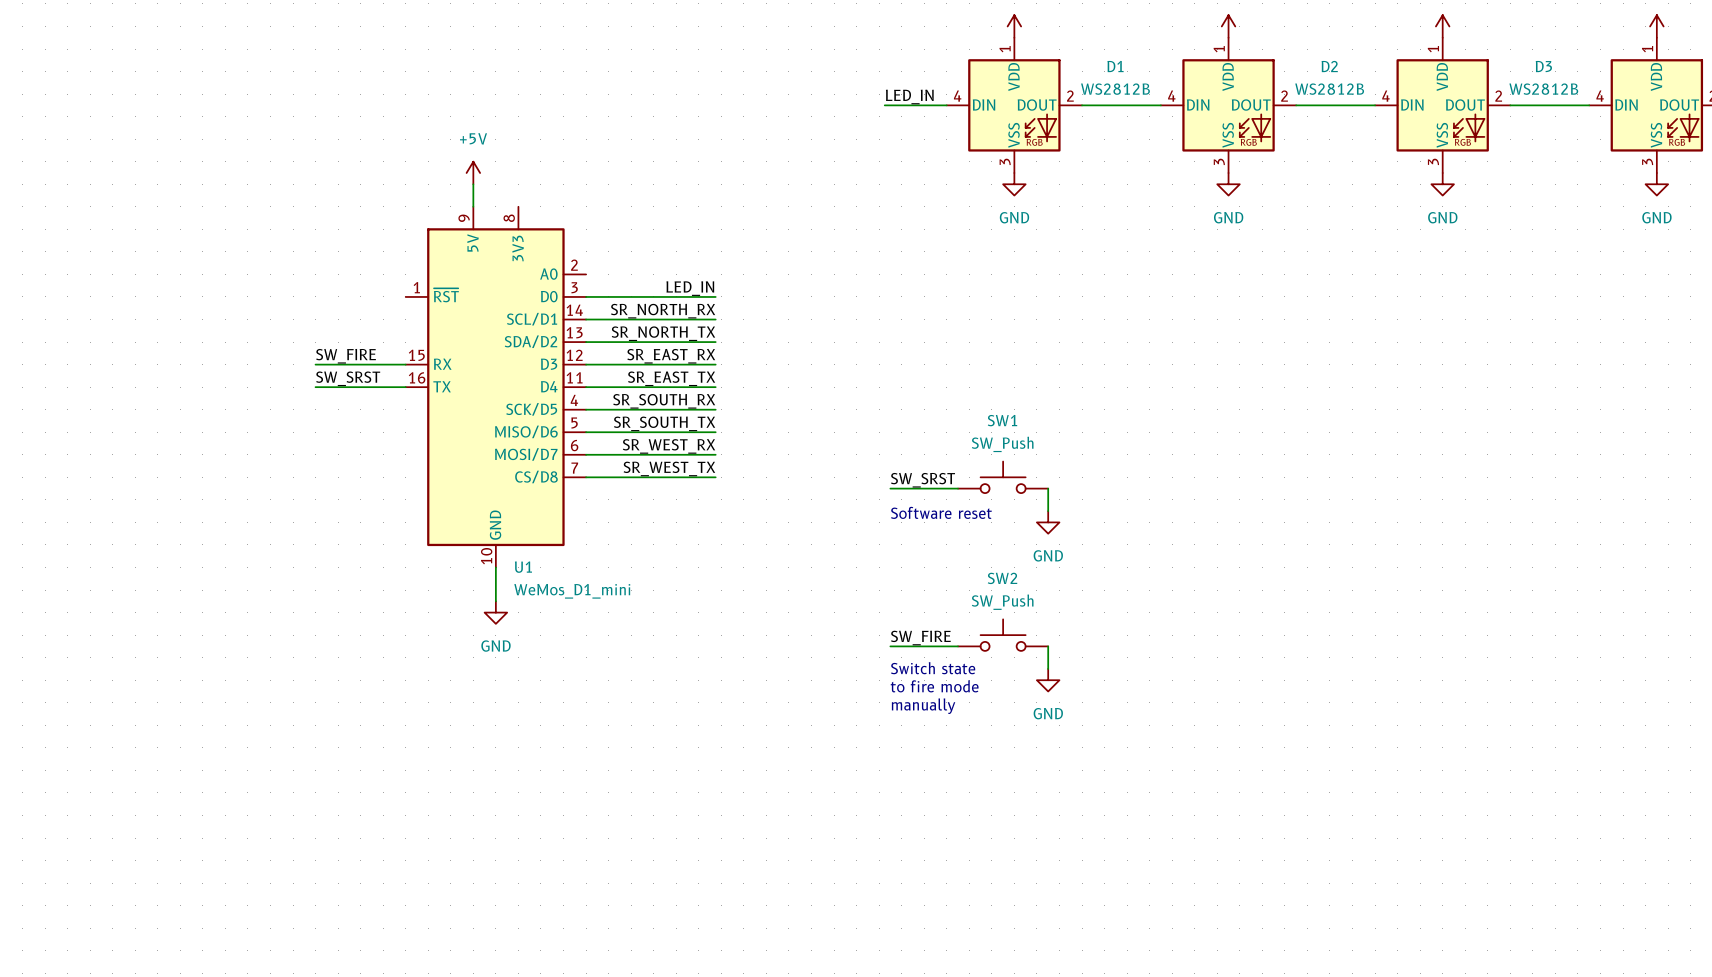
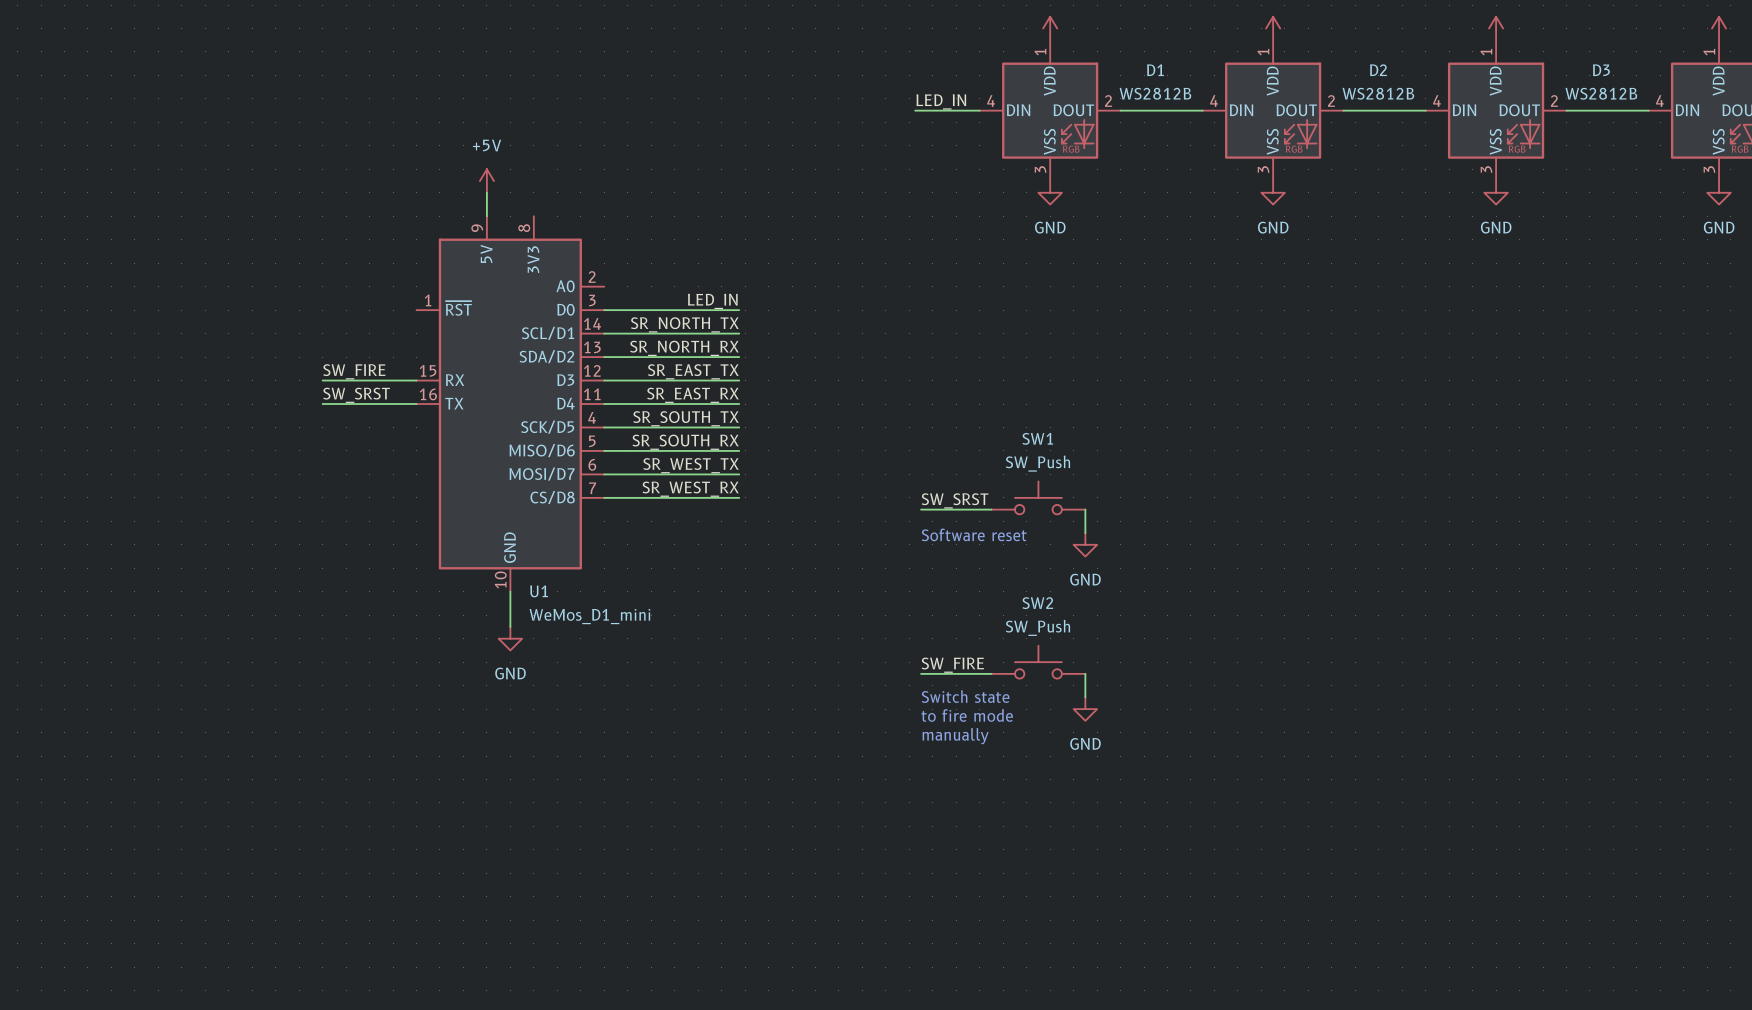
label: SR_NORTH_RX (663, 311) -> SR_NORTH_TX (684, 324)
label: SR_NORTH_TX (663, 333) -> SR_NORTH_RX (684, 348)
label: SR_EAST_RX (671, 356) -> SR_EAST_TX (693, 371)
label: SR_EAST_TX (671, 378) -> SR_EAST_RX (692, 395)
label: SR_SOUTH_RX (664, 401) -> SR_SOUTH_TX (686, 418)
label: SR_SOUTH_TX (664, 423) -> SR_SOUTH_RX (685, 442)
label: SR_WEST_RX (669, 446) -> SR_WEST_TX (691, 465)
label: SR_WEST_TX (669, 468) -> SR_WEST_RX (690, 489)

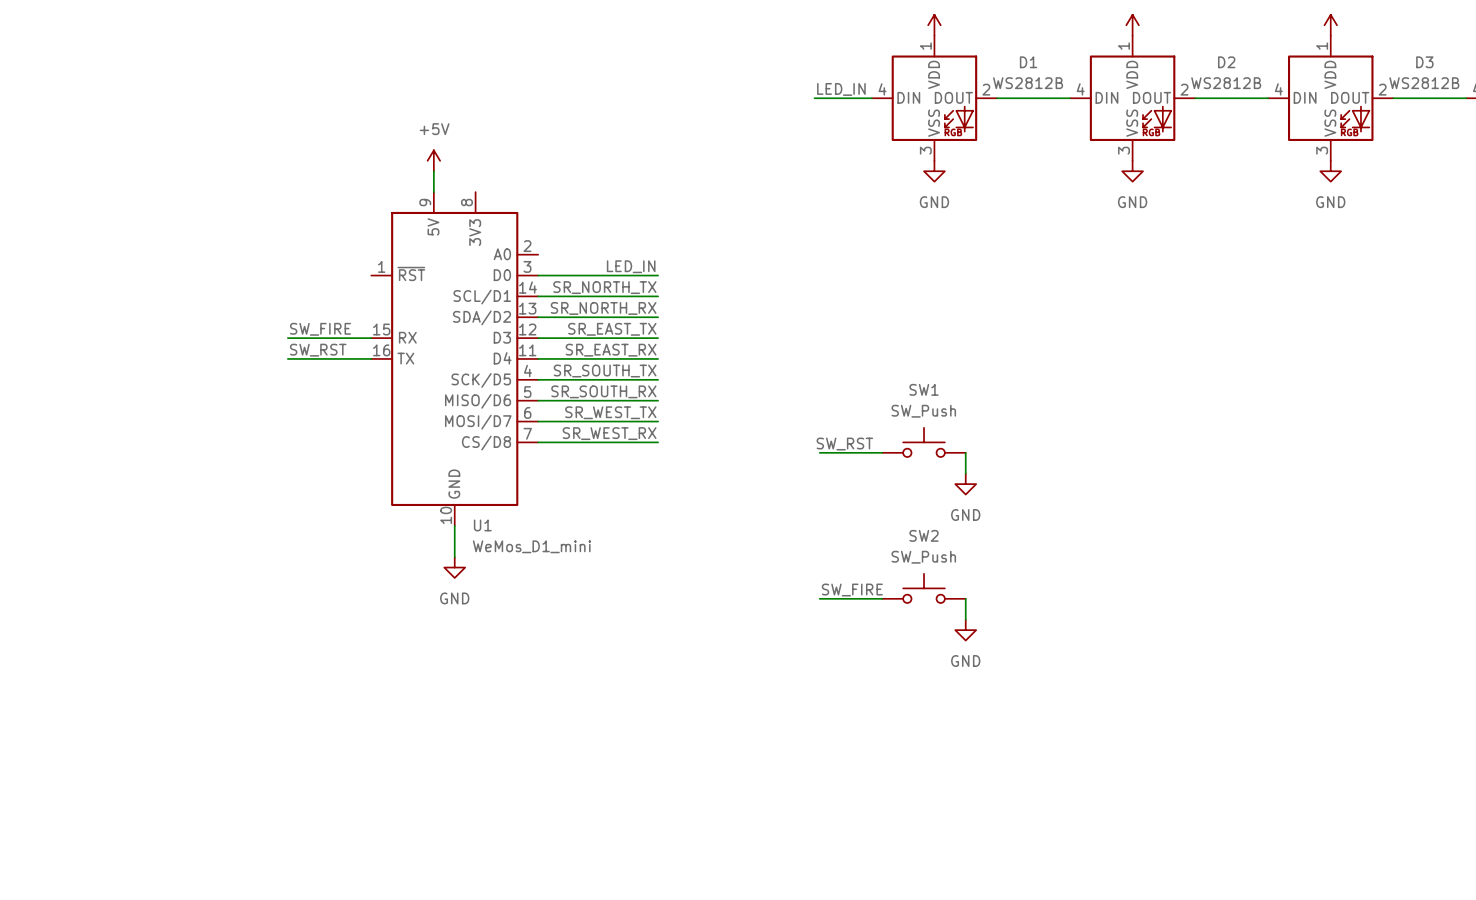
label: SW_SRST (356, 395) -> SW_RST (318, 350)
label: SW_SRST (955, 500) -> SW_RST (844, 444)
text: Software reset (974, 534) -> none
text: Switch state (965, 696) -> none
text: to fire mode (967, 715) -> none
text: manually (955, 736) -> none

